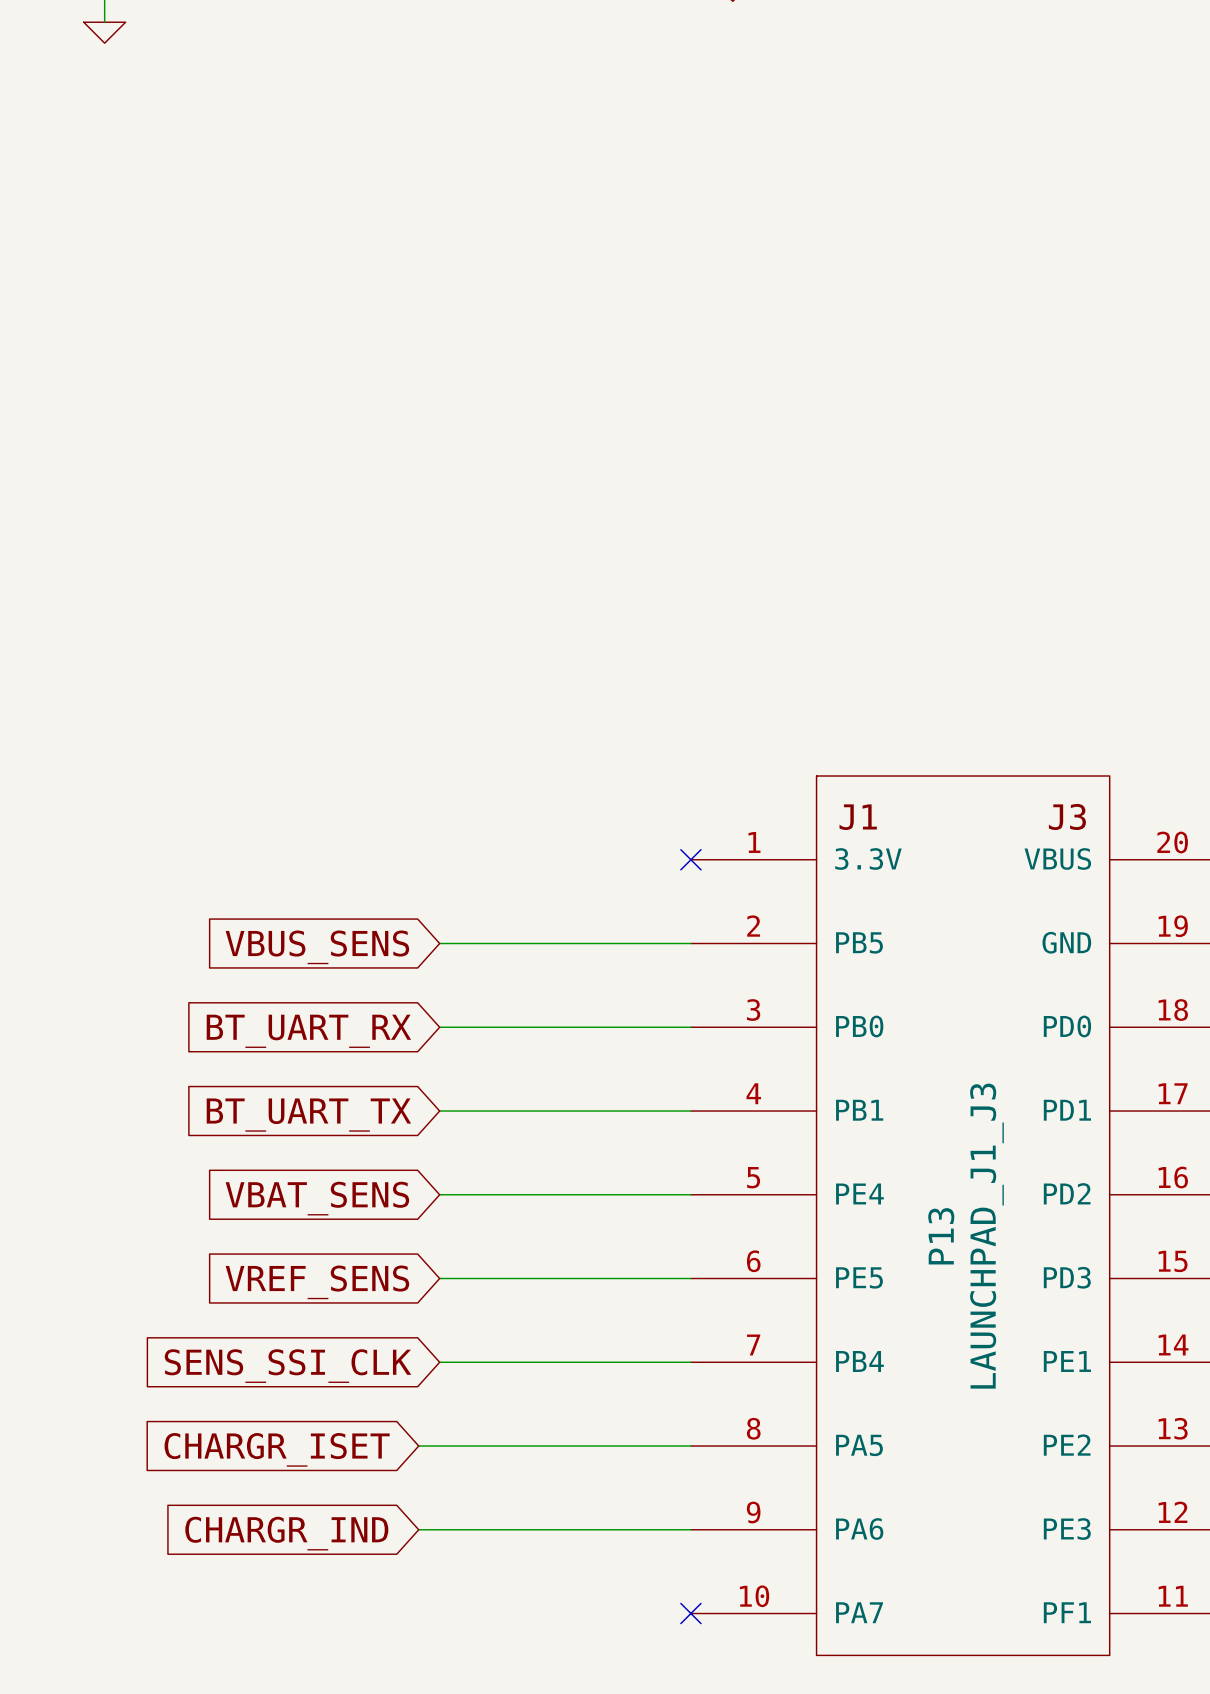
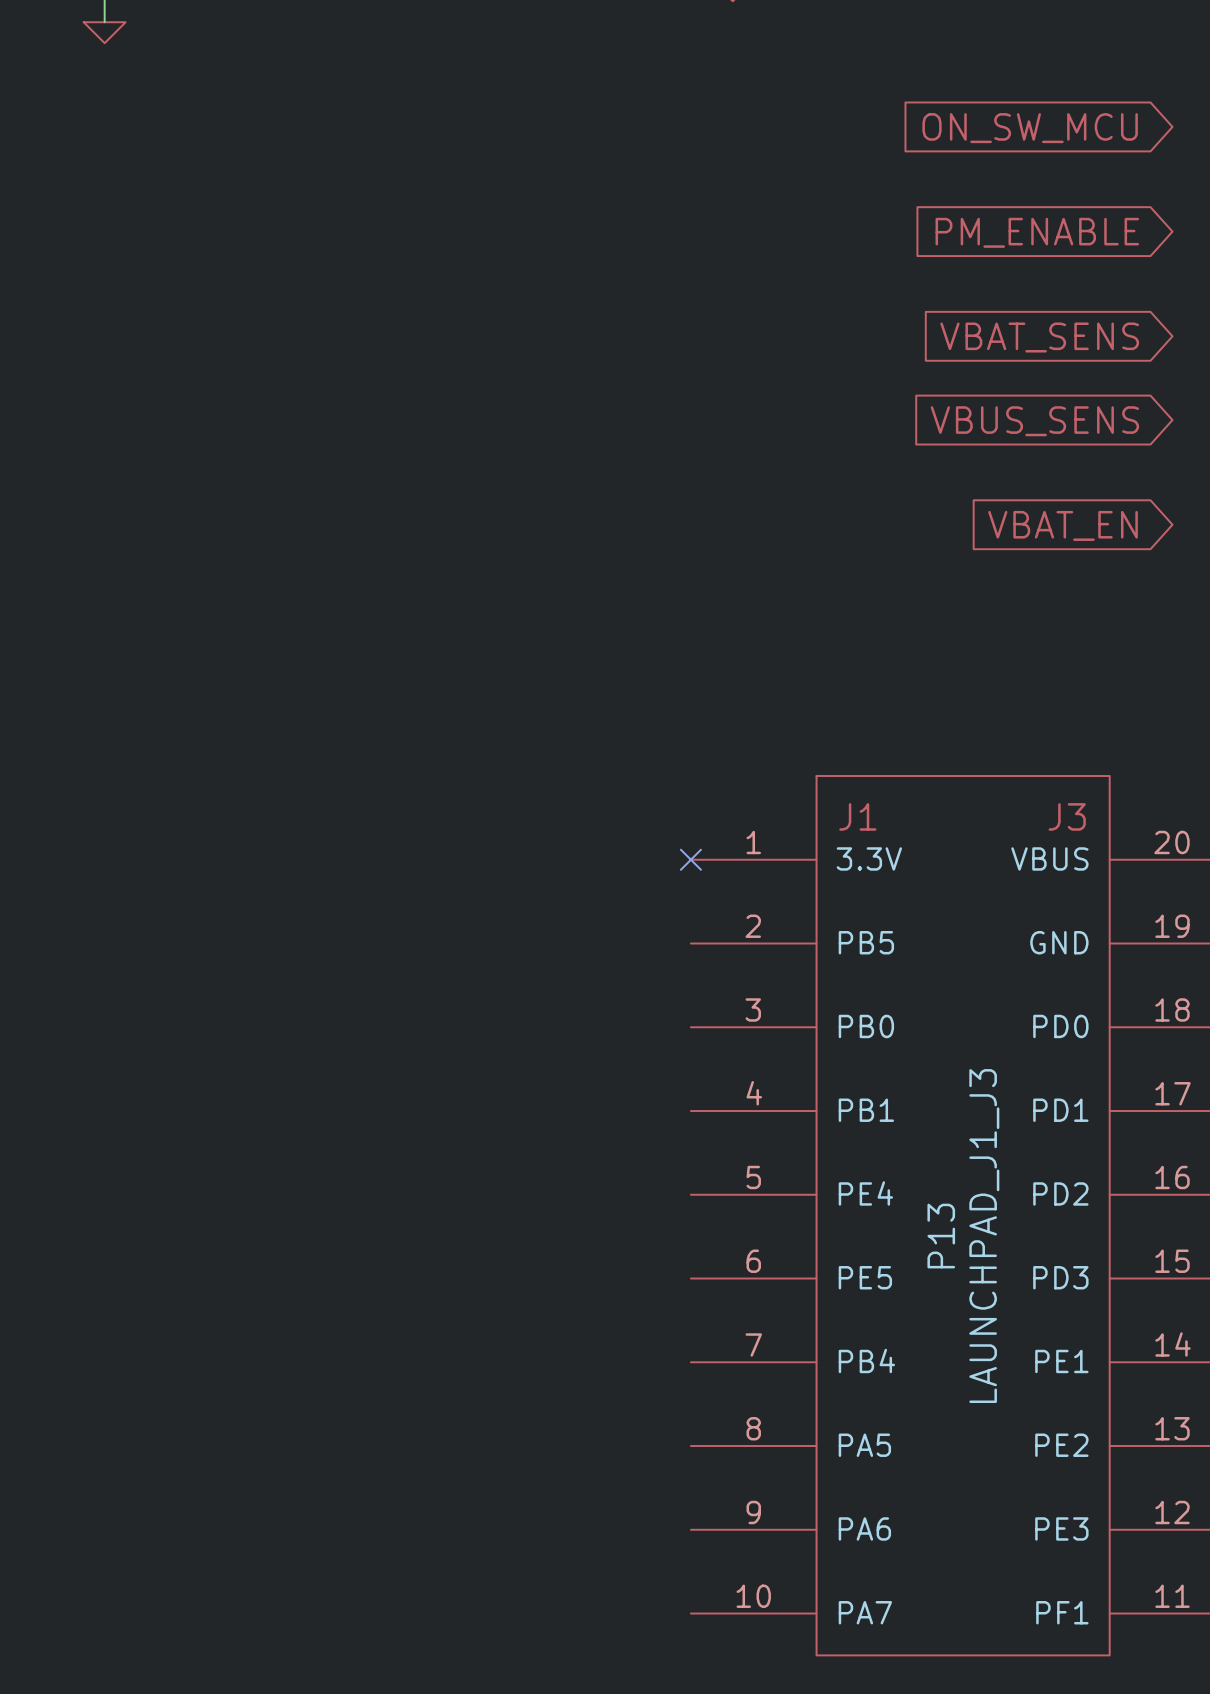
global label: none -> ON_SW_MCU (1030, 128)
global label: none -> PM_ENABLE (1037, 232)
global label: none -> VBAT_SENS (1039, 337)
global label: none -> VBUS_SENS (1034, 421)
global label: none -> VBAT_EN (1063, 525)
wire: (439, 943) (690, 943) -> none
global label: VBUS_SENS (317, 947) -> none
wire: (439, 1027) (690, 1027) -> none
global label: BT_UART_RX (308, 1031) -> none
wire: (439, 1111) (690, 1111) -> none
global label: BT_UART_TX (308, 1115) -> none
wire: (439, 1194) (690, 1194) -> none
global label: VBAT_SENS (317, 1198) -> none
wire: (439, 1278) (690, 1278) -> none
global label: VREF_SENS (317, 1282) -> none
wire: (439, 1362) (690, 1362) -> none
global label: SENS_SSI_CLK (288, 1366) -> none
wire: (418, 1446) (690, 1446) -> none
global label: CHARGR_ISET (277, 1449) -> none
wire: (418, 1529) (690, 1529) -> none
global label: CHARGR_IND (286, 1533) -> none
no-connect mark: (690, 1613) -> none

